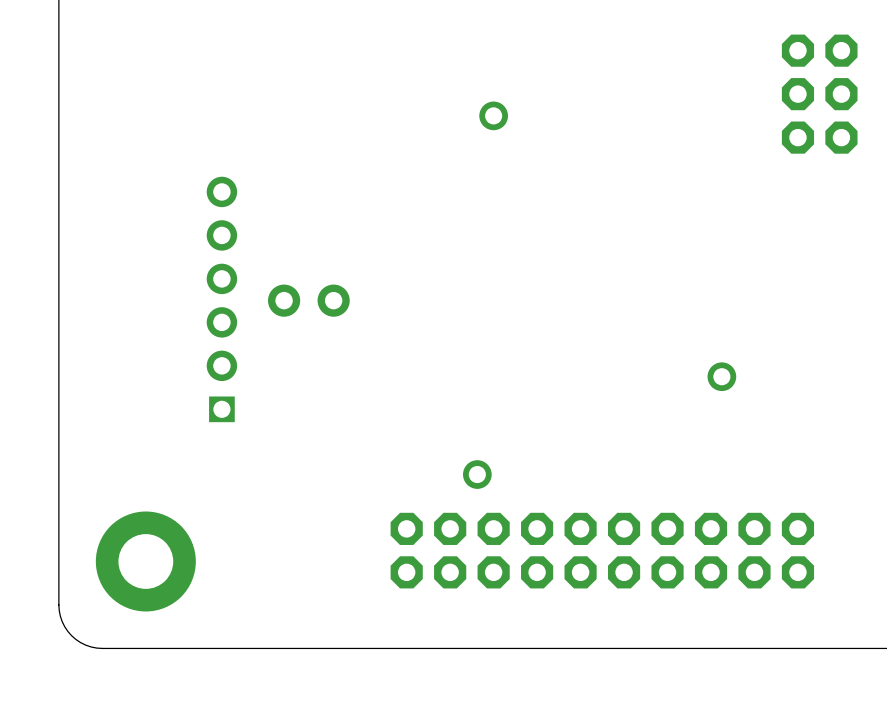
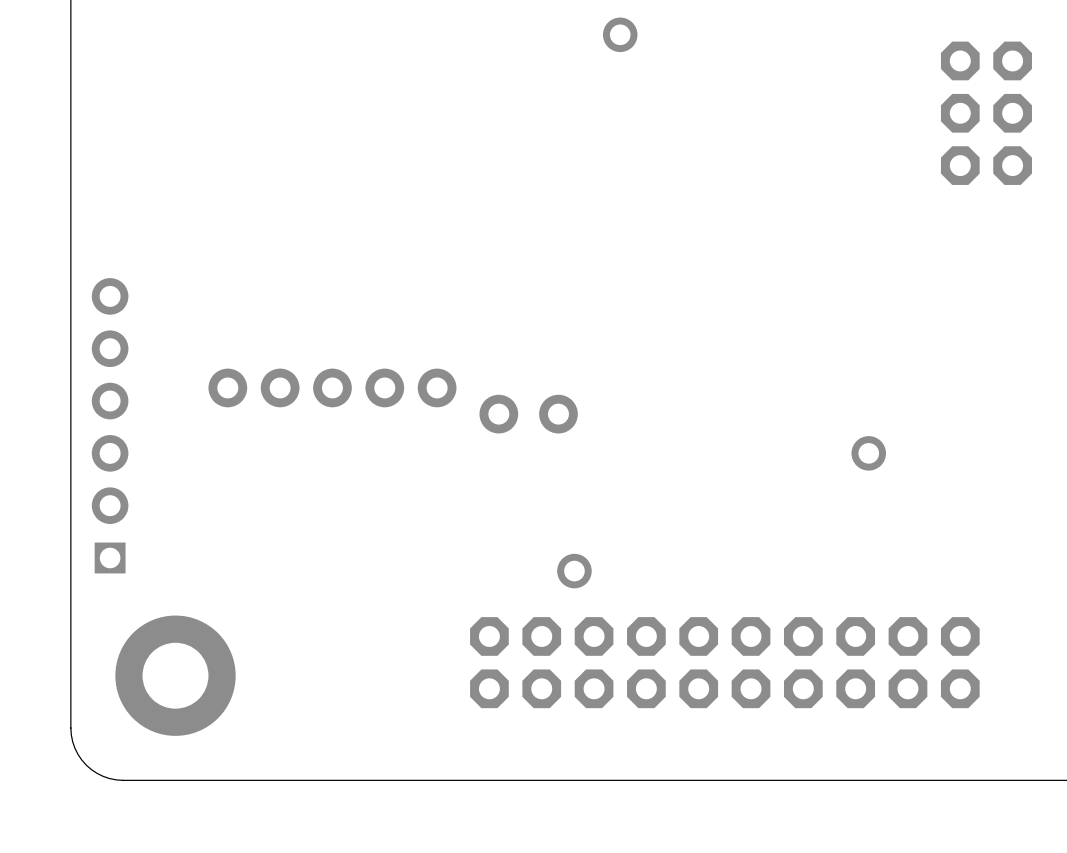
part position: (493, 115) -> (620, 34)
part position: (221, 299) -> (110, 425)
part position: (308, 300) -> (528, 414)
part: none -> (332, 387)

